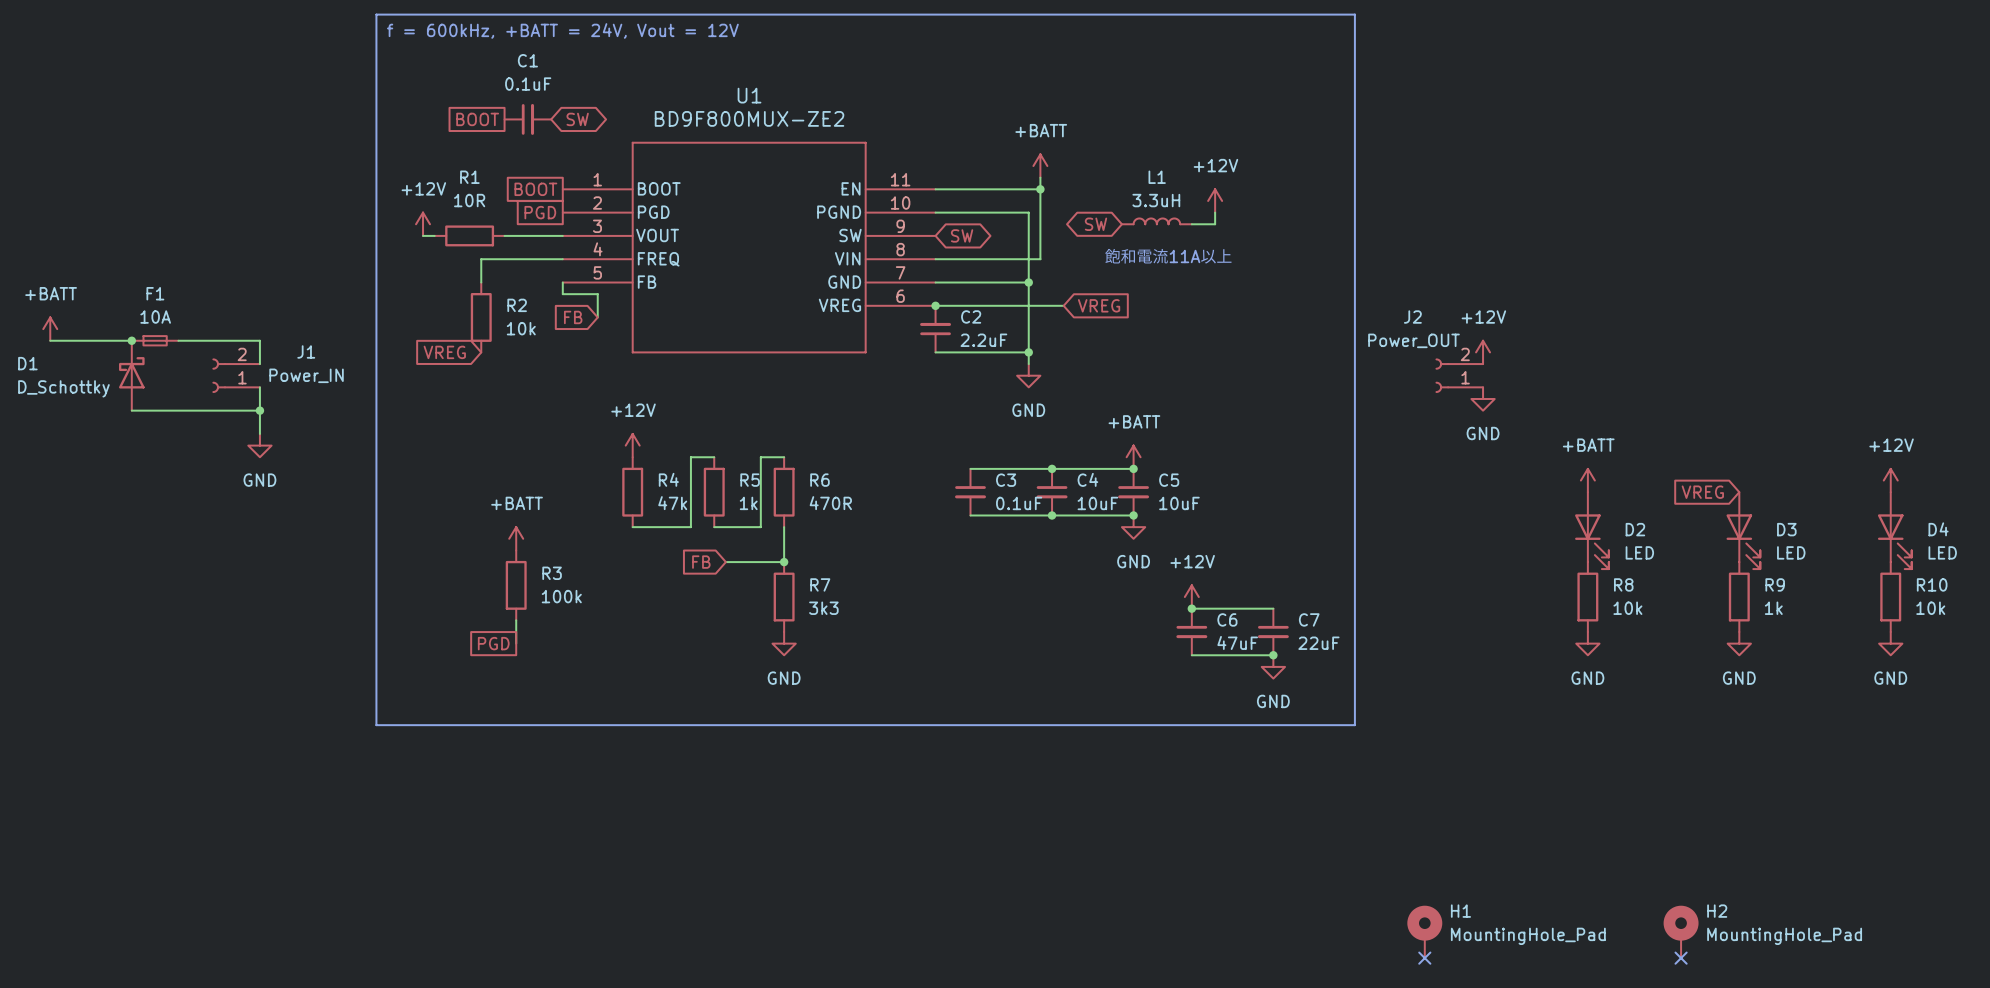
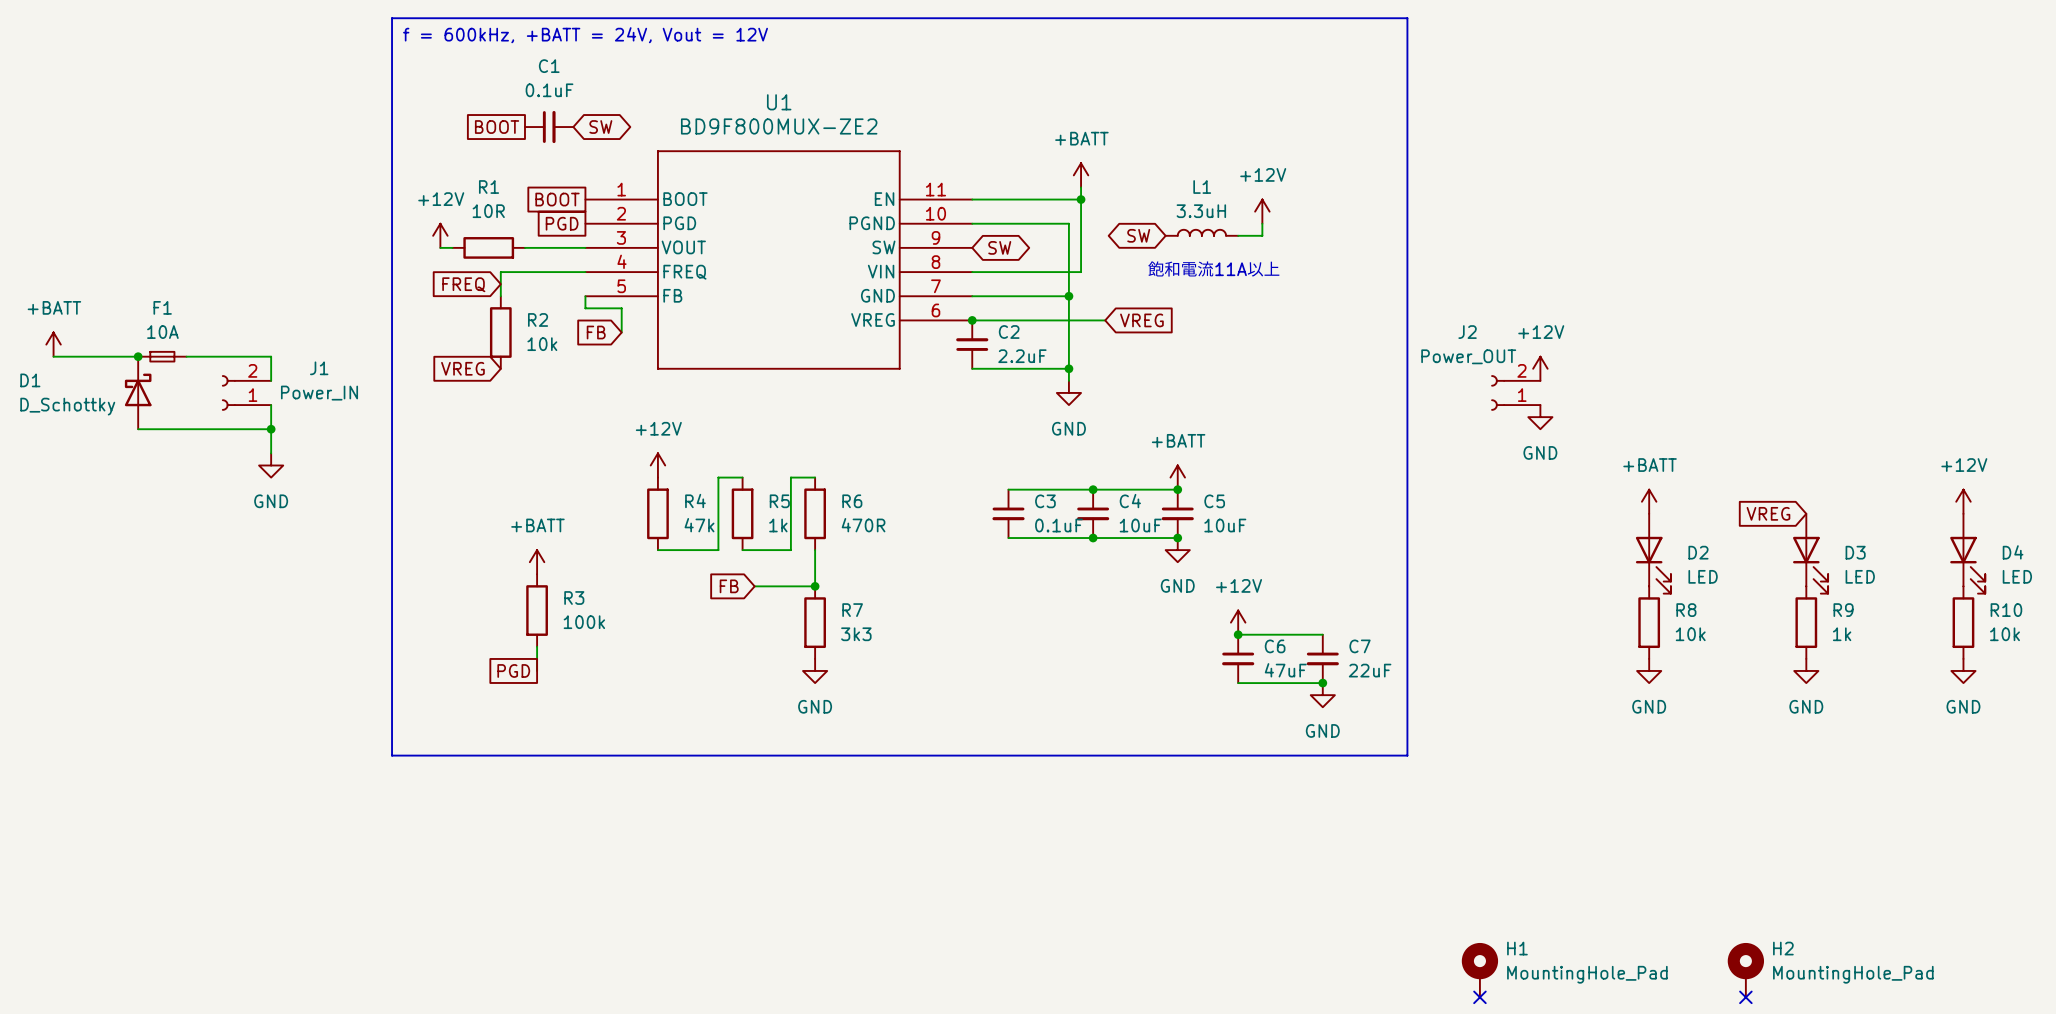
global label: none -> FREQ (463, 284)

